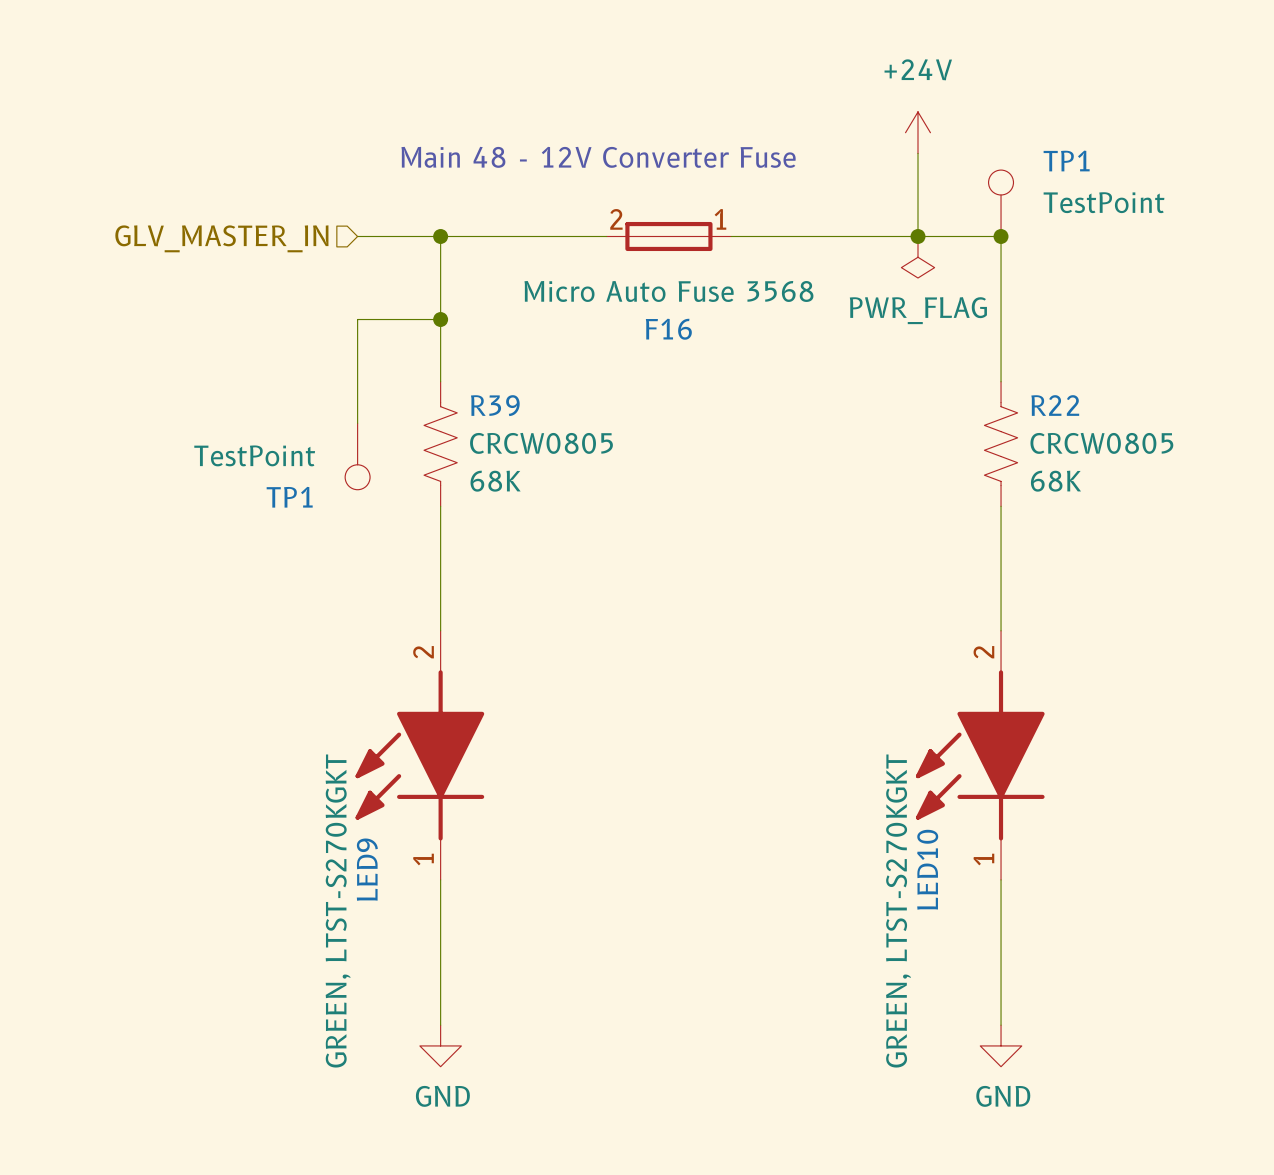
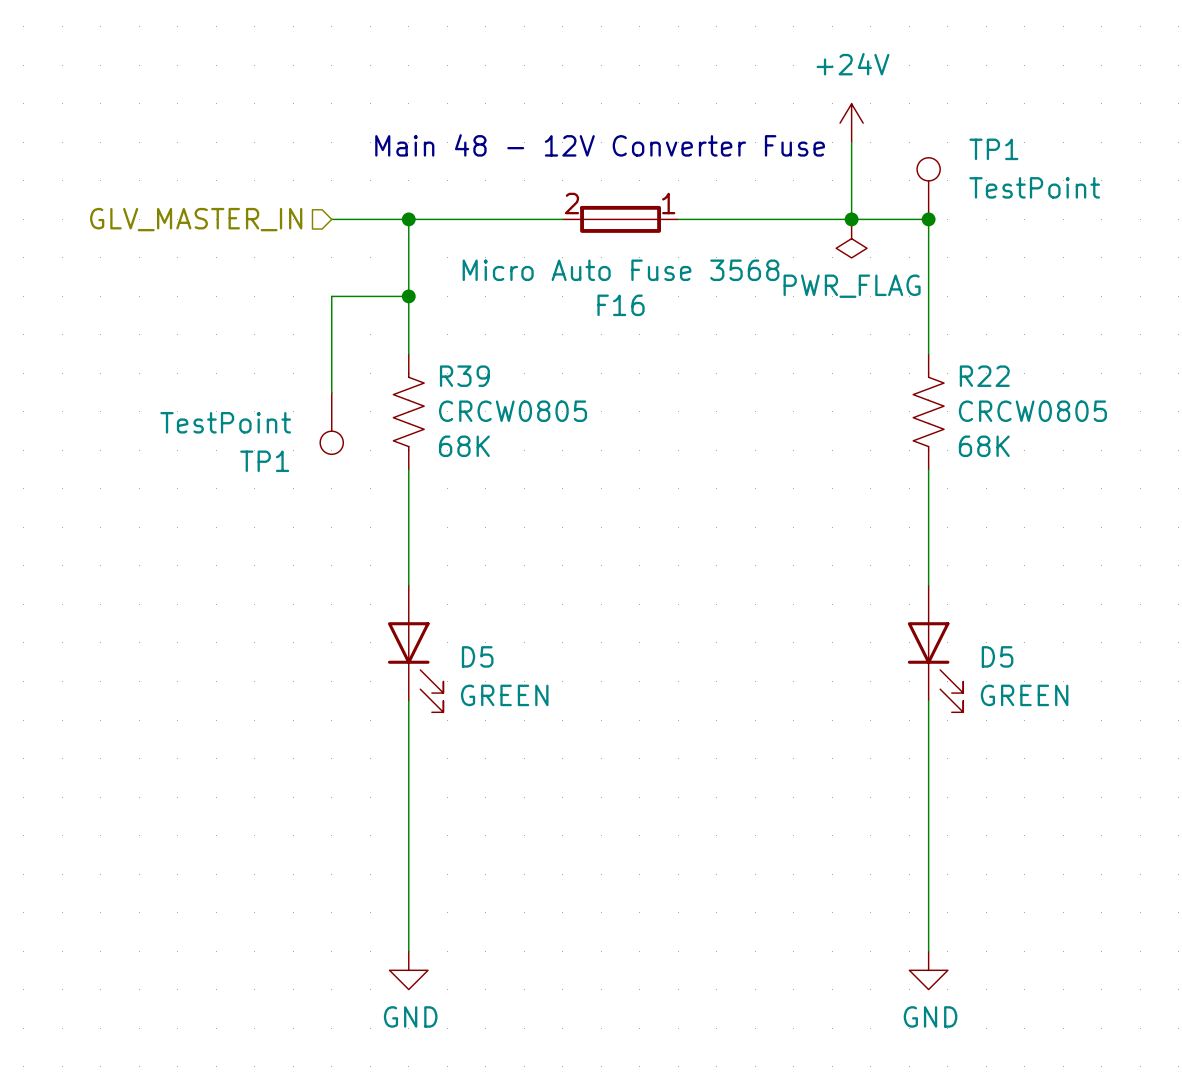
D5: none -> GREEN (415, 648)
D5: none -> GREEN (935, 648)
LED9: GREEN, LTST-S270KGKT (419, 755) -> none
LED10: GREEN, LTST-S270KGKT (980, 755) -> none

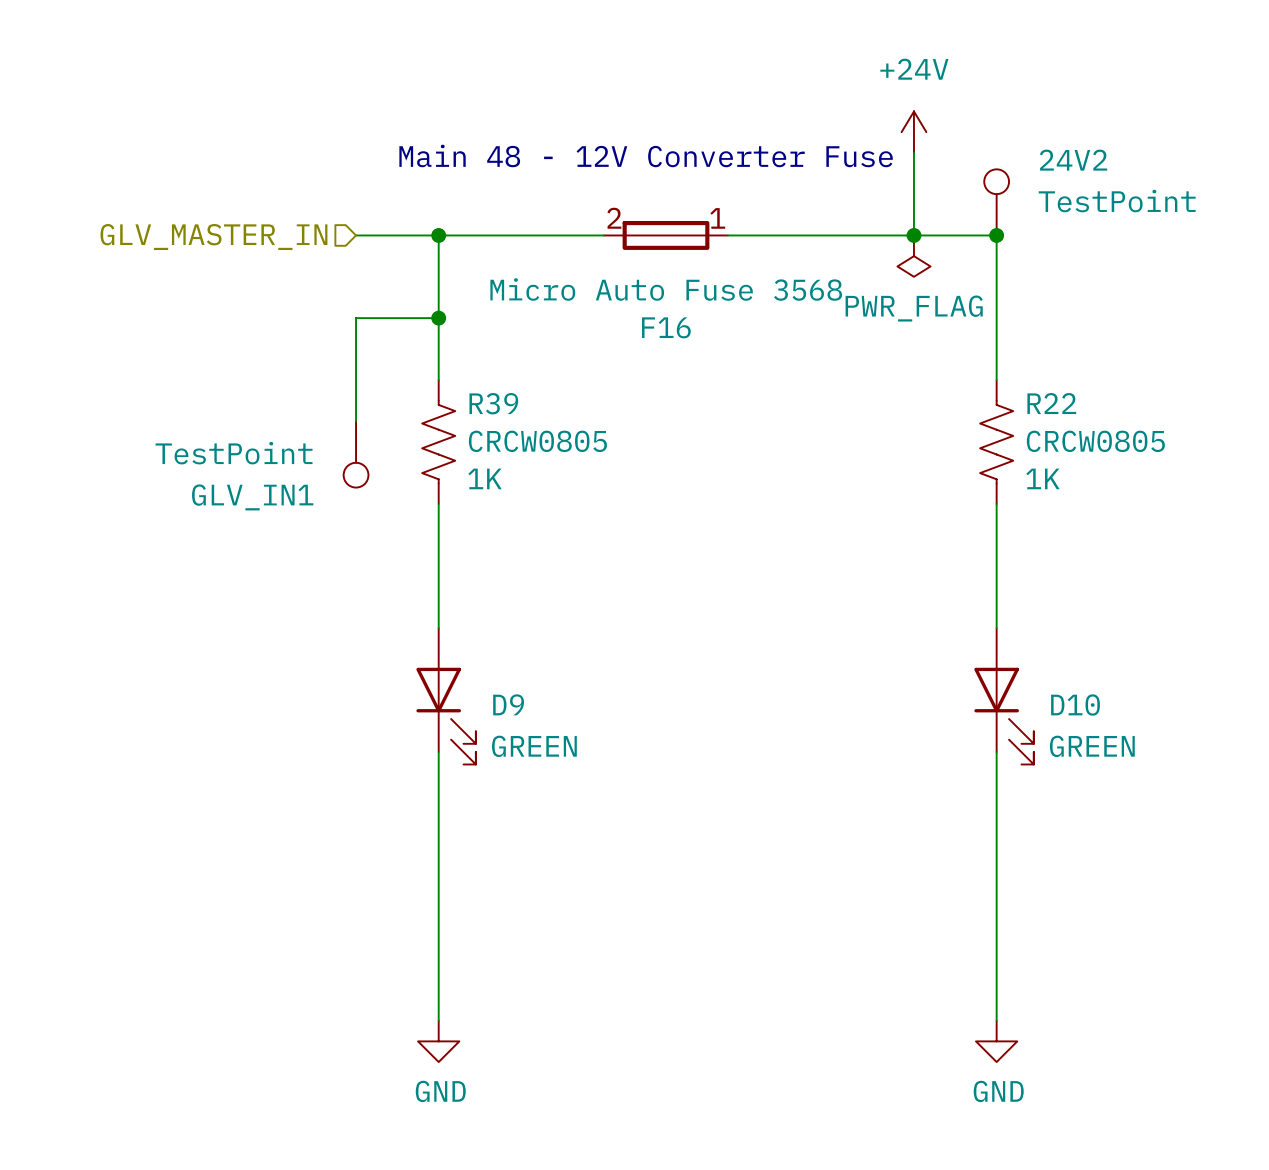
TP1 name: TP1 (993, 149) -> 24V2 (1073, 160)
R39 text: 68K (464, 446) -> 1K (485, 478)
R22 text: 68K (984, 446) -> 1K (1042, 478)
TP1 name: TP1 (264, 461) -> GLV_IN1 (252, 497)
D5 name: D5 (477, 656) -> D9 (508, 704)
D5 name: D5 (997, 656) -> D10 (1075, 705)

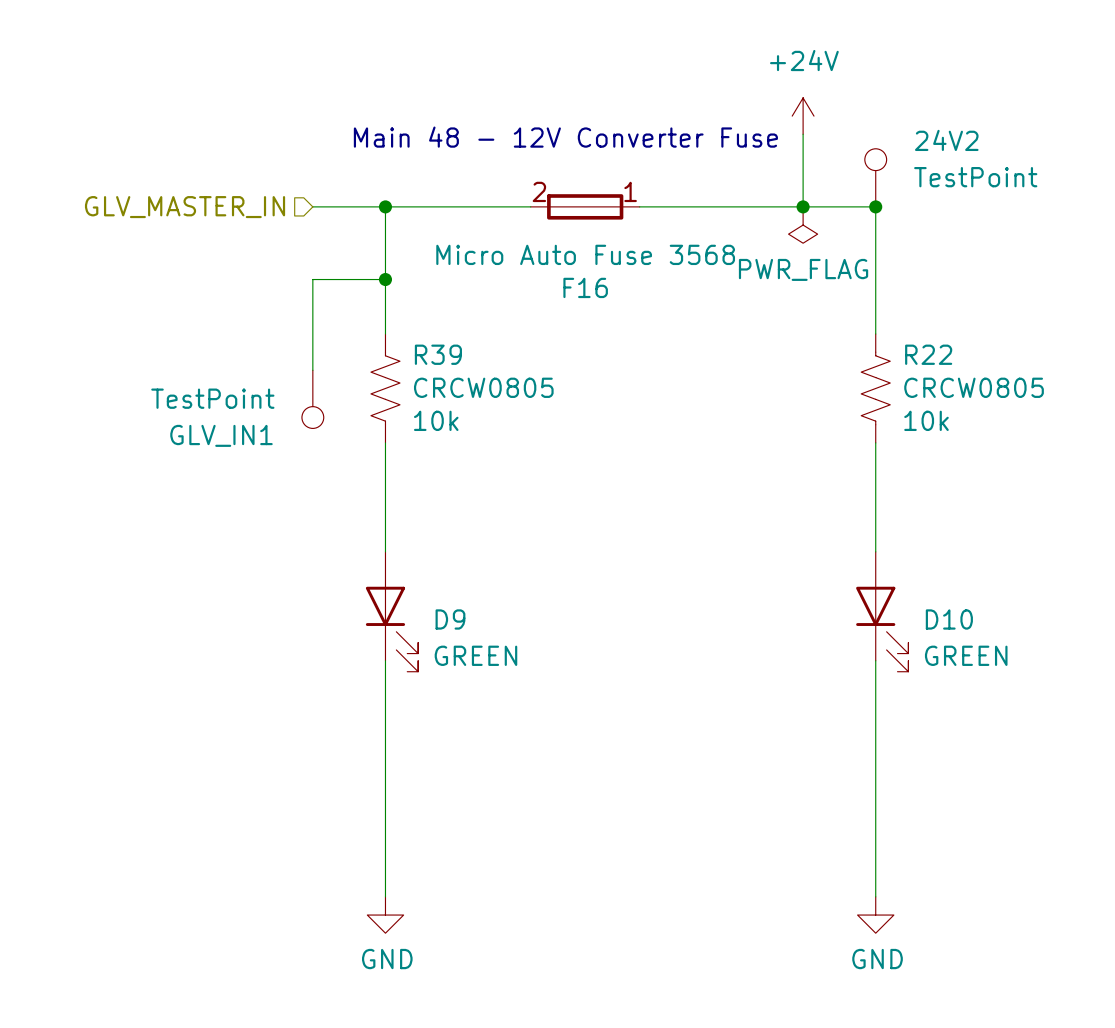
R39 text: 1K (485, 478) -> 10k (436, 420)
R22 text: 1K (1042, 478) -> 10k (926, 420)

